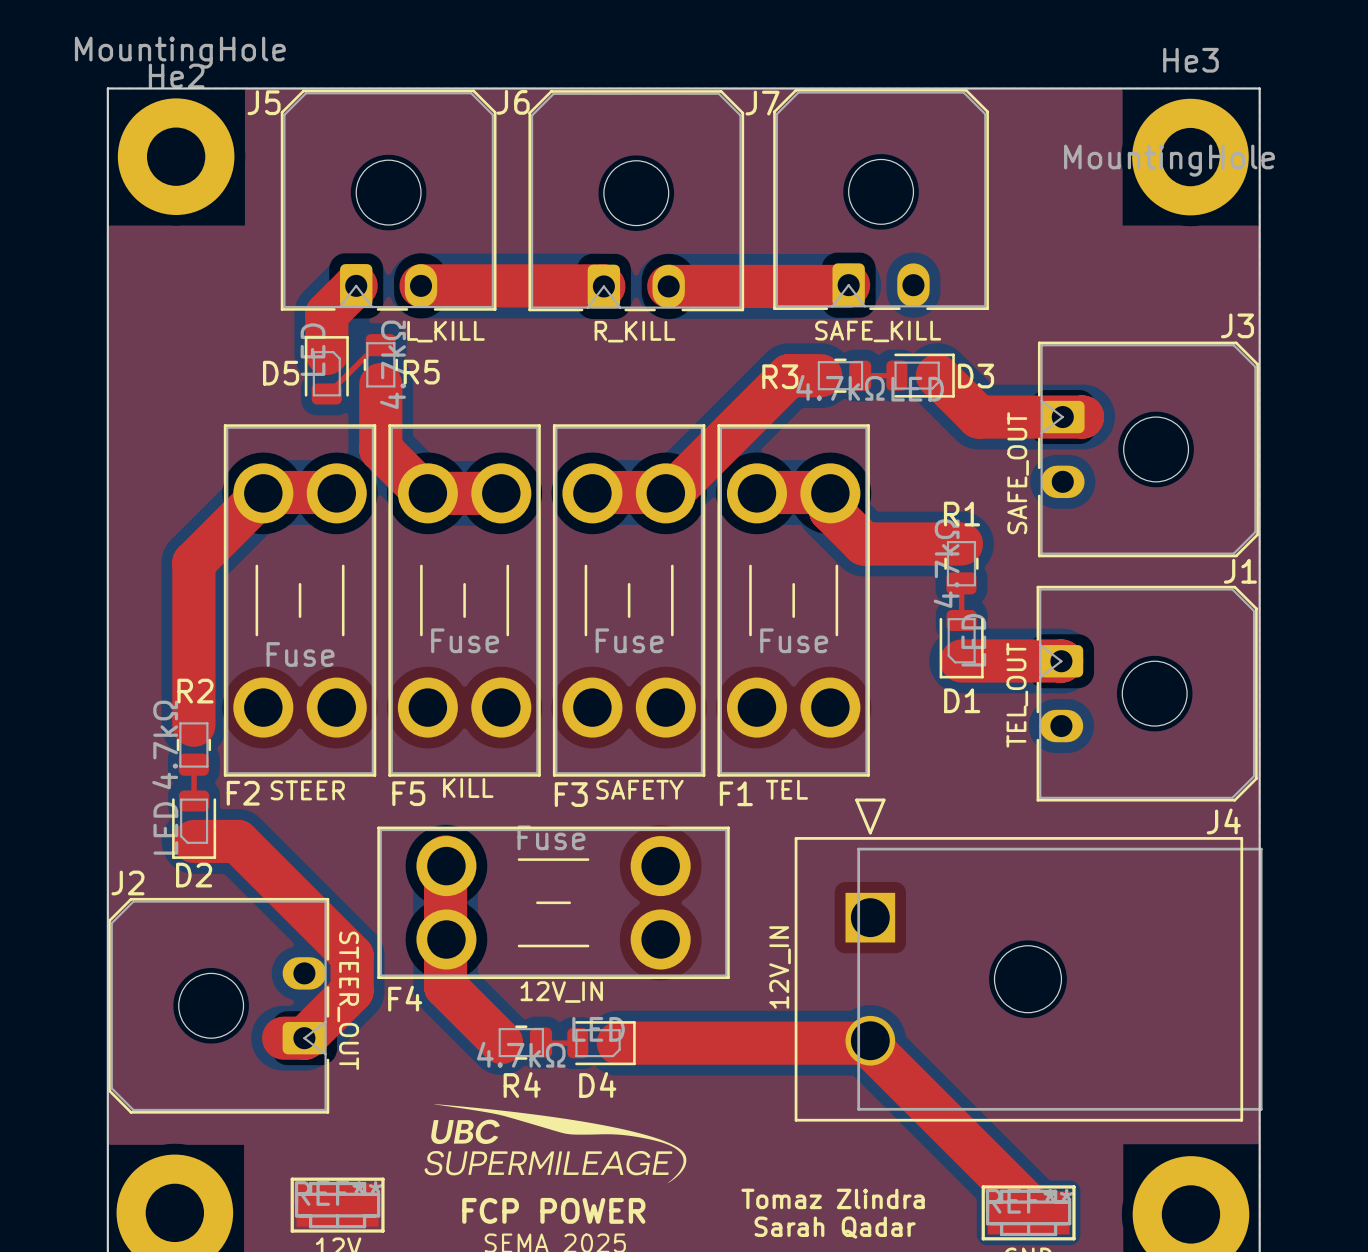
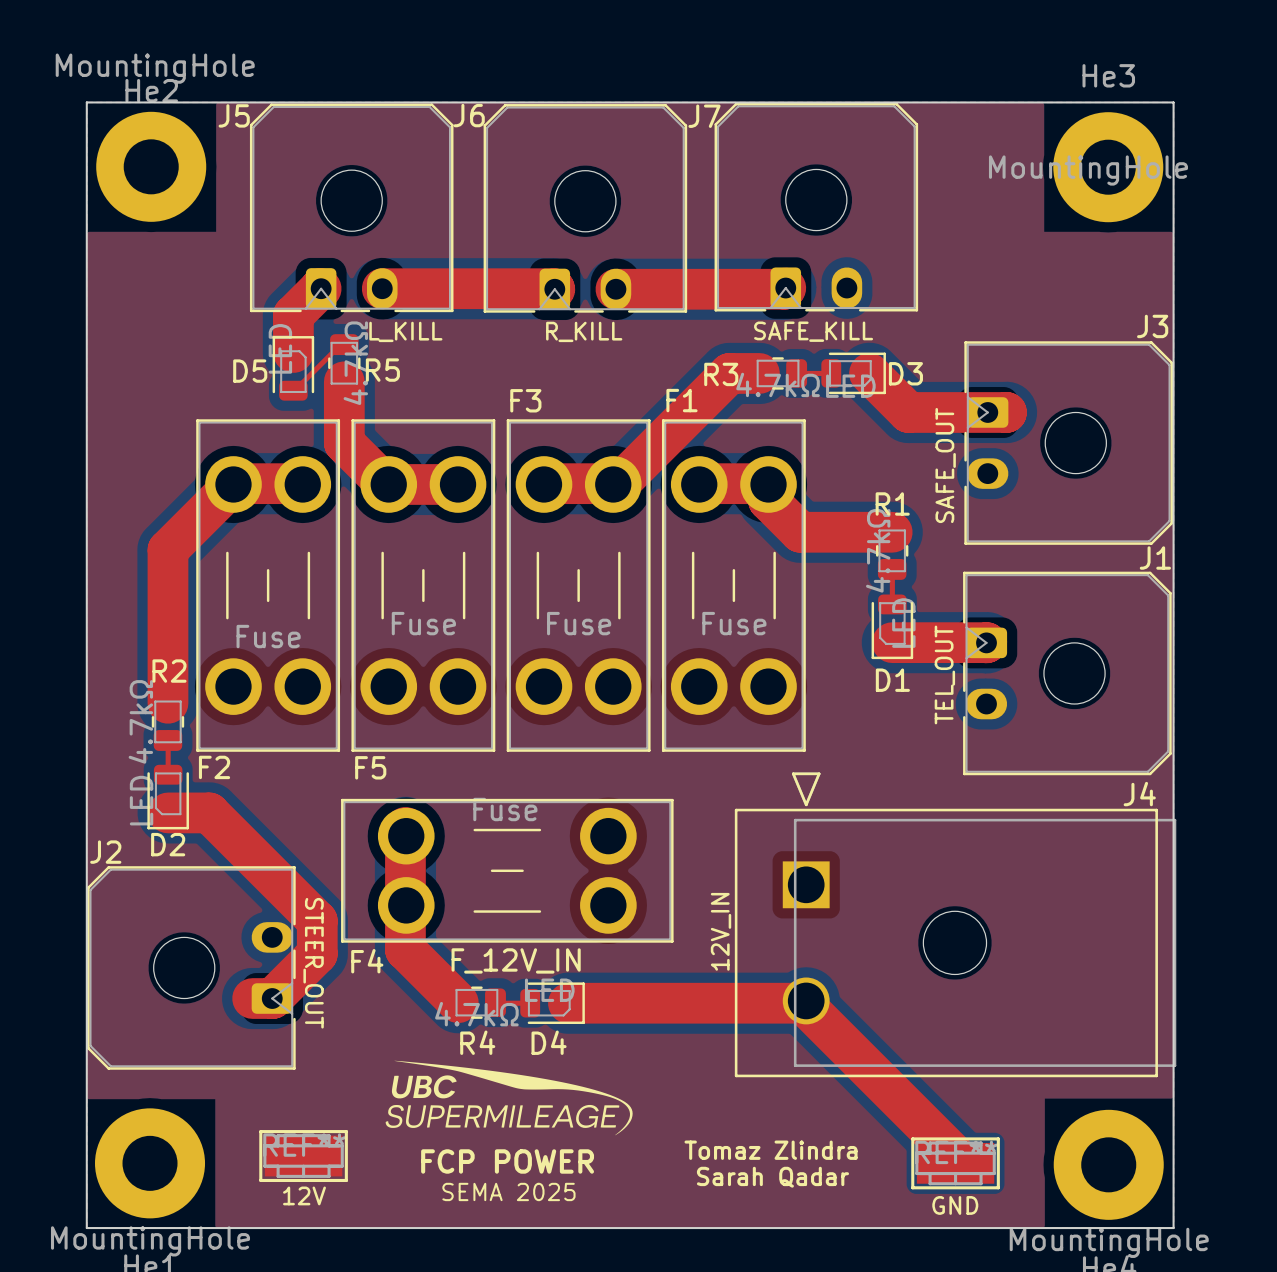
text: KILL (468, 787) -> none
text: SAFETY (639, 789) -> none
text: TEL (786, 789) -> none
text: STEER (307, 790) -> none
F1 name position: F1 (736, 793) -> F1 (681, 400)
F3 name position: F3 (571, 794) -> F3 (525, 400)
text: 12V_IN (561, 992) -> F_12V_IN (516, 960)

